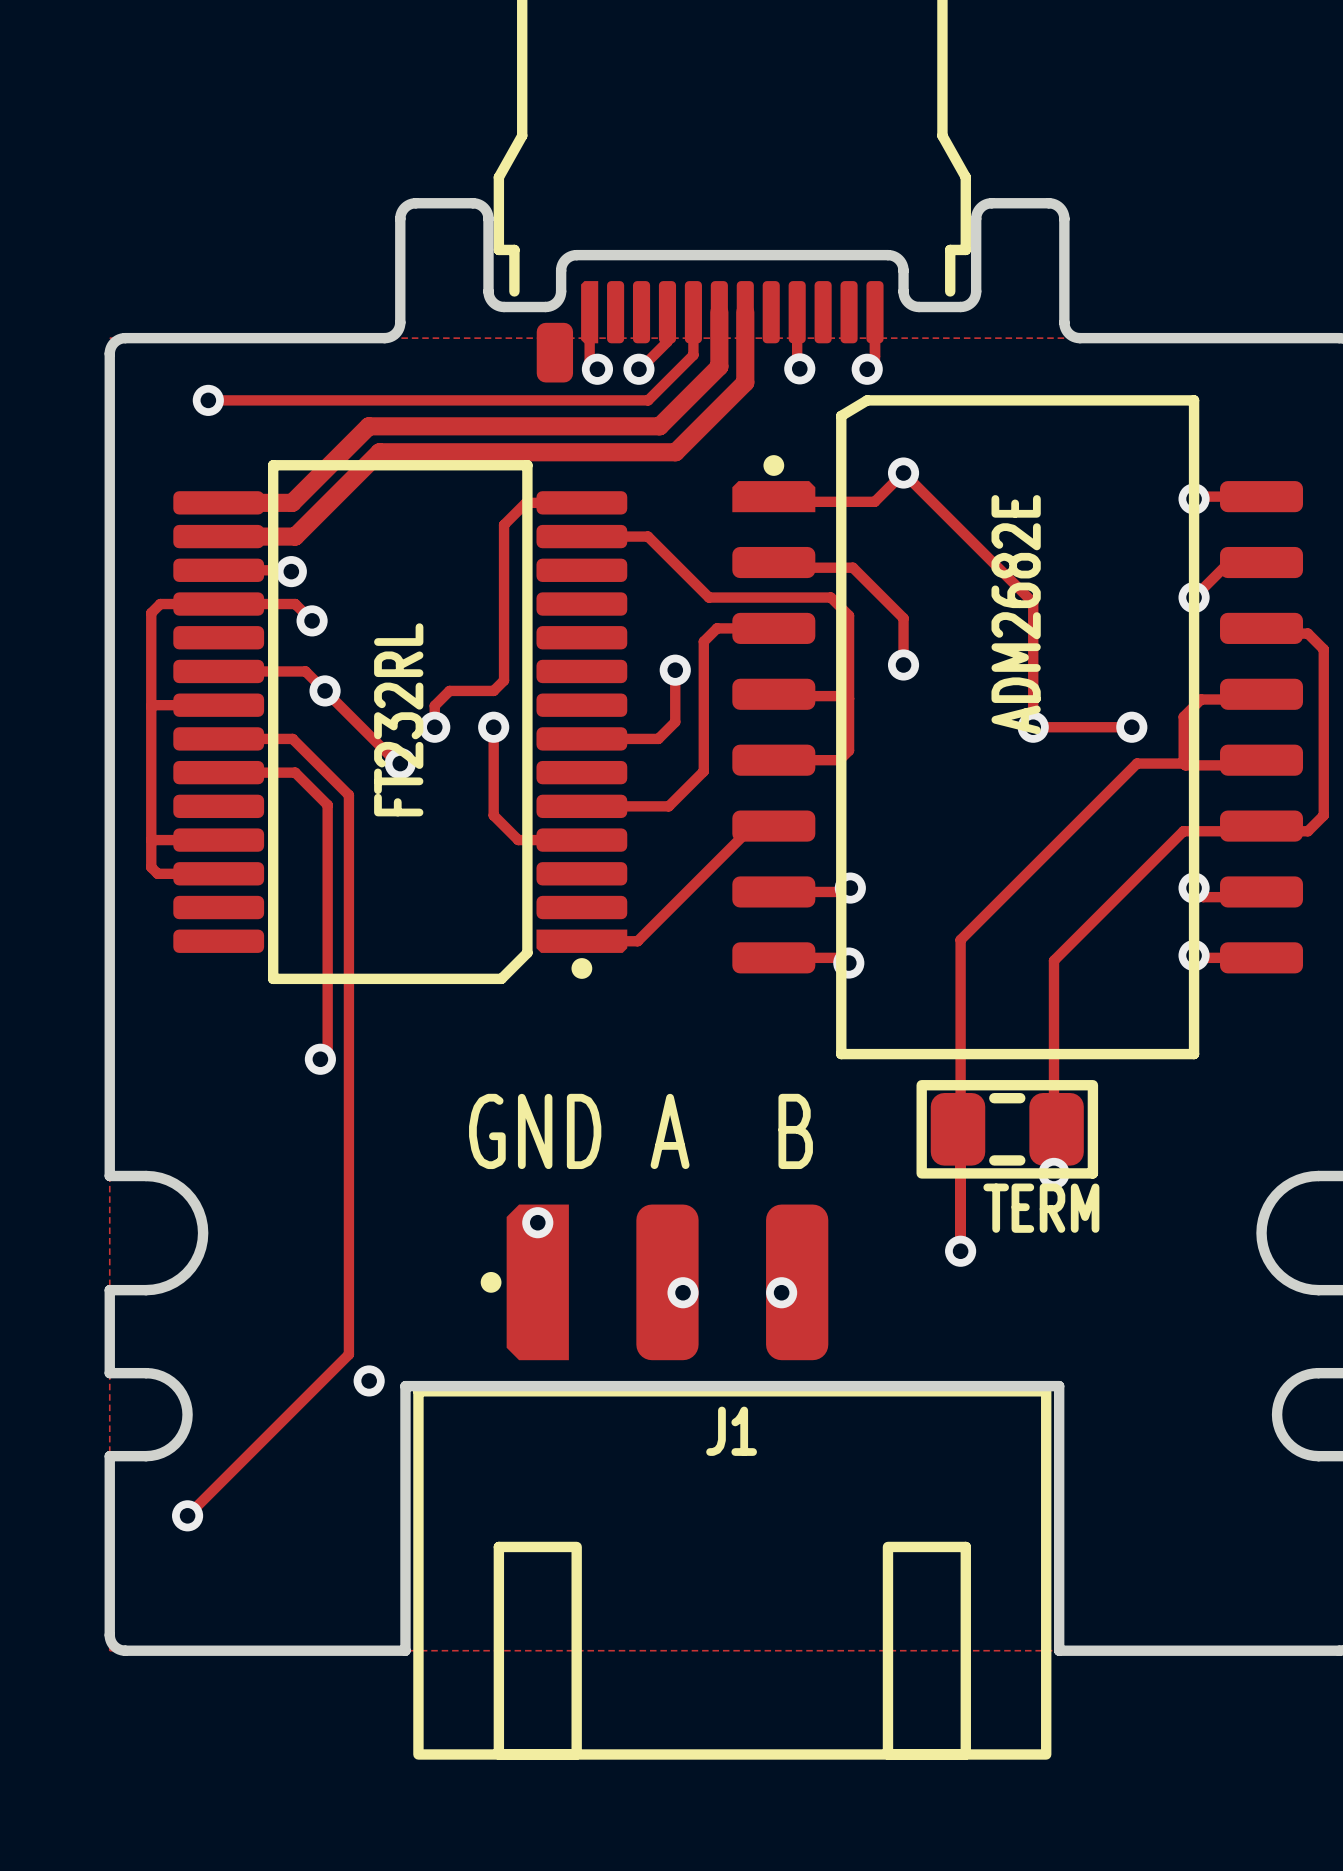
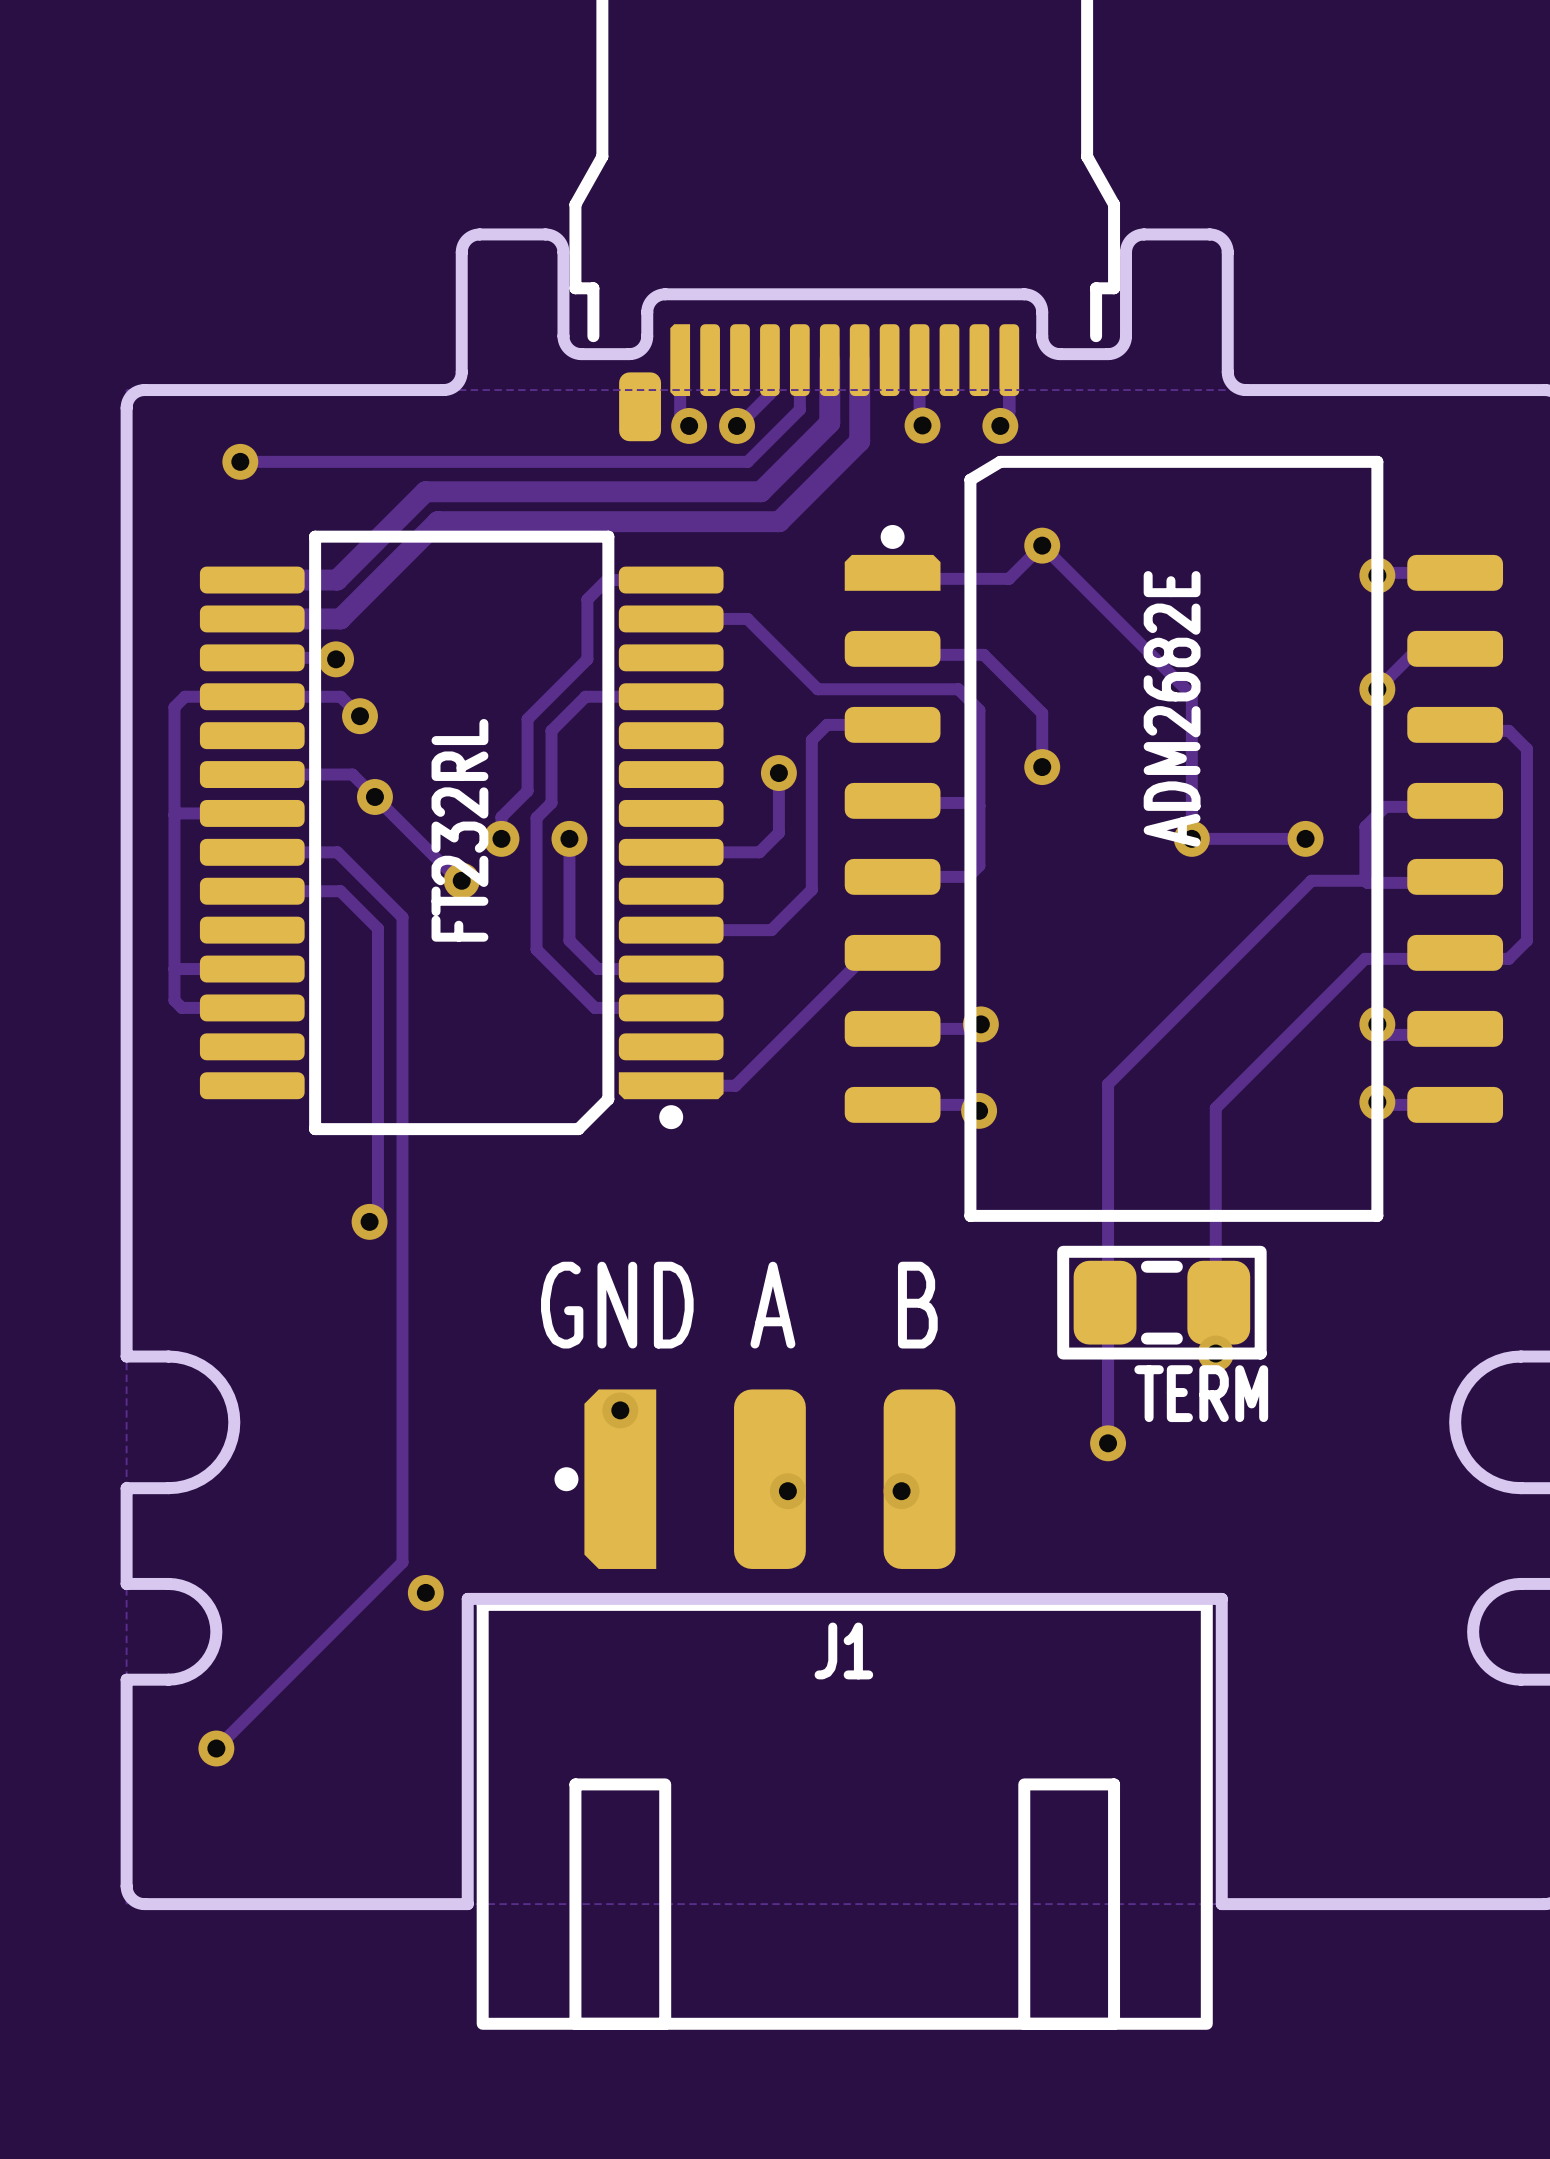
track: (509, 519) (504, 524) (504, 680) (493, 690) (449, 690) (434, 705) (434, 708) -> (587, 599) (587, 659) (527, 719) (527, 791) (501, 817)
track: none -> (671, 696) (585, 696) (551, 730) (551, 802) (536, 817) (536, 949) (594, 1007) (671, 1007)

